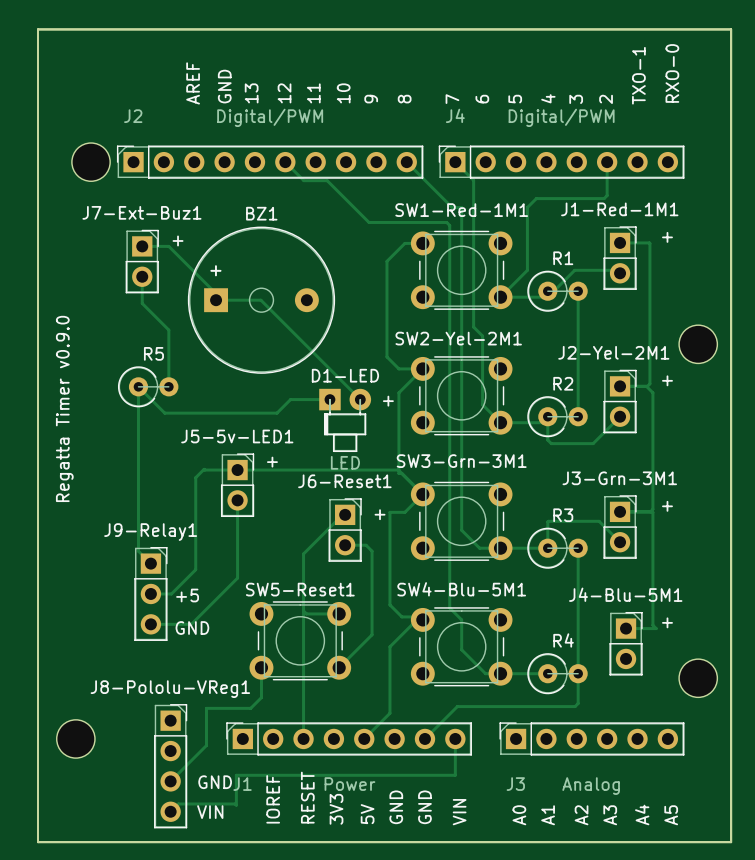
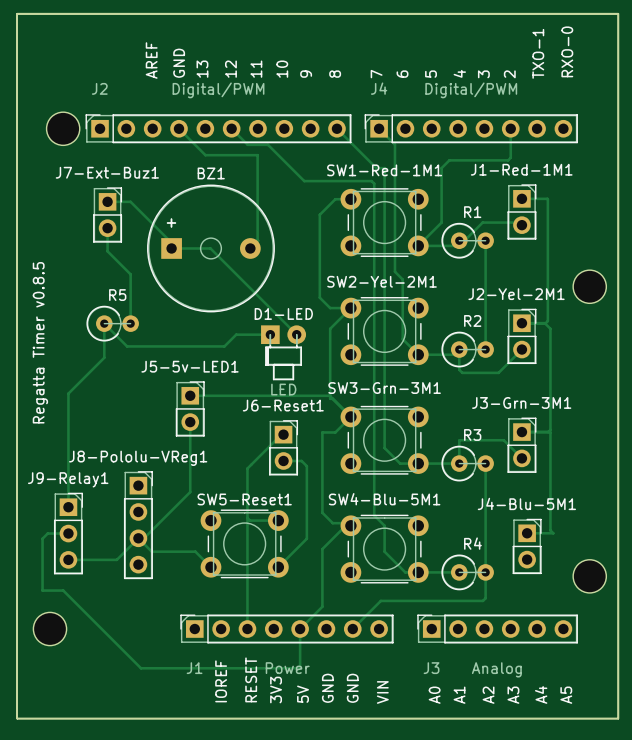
track: none -> (179, 128) (205, 155) (257, 155) (258, 240) (250, 248)
text: + (667, 237) -> none
text: + (178, 240) -> none
text: + (667, 380) -> none
text: + (388, 401) -> none
text: Regatta Timer v0.9.0 (64, 408) -> Regatta Timer v0.8.5 (40, 342)
track: (138, 426) (138, 551) (150, 563) -> (104, 357) (68, 393) (68, 507)
text: + (272, 462) -> none
track: (237, 470) (204, 469) (195, 477) (195, 569) (171, 593) (150, 593) -> none
text: + (667, 506) -> none
text: + (380, 514) -> none
track: (237, 578) (191, 624) (150, 624) -> (190, 489) (190, 492) (144, 538) (138, 538) (151, 551) (195, 551) (210, 567)
J9-Relay1 position: (150, 593) -> (68, 533)
text: +5 (187, 595) -> none
text: + (667, 622) -> none
track: none -> (68, 533) (47, 533) (42, 538) (42, 590) (63, 590) (141, 668) (299, 668) (300, 629)
text: GND (192, 628) -> none
track: none -> (133, 543) (116, 559) (68, 559)
track: (261, 667) (261, 697) (250, 708) (206, 708) (206, 745) (170, 781) -> none
track: (455, 738) (455, 775) (236, 775) (236, 805) (178, 803) (170, 811) -> none
J8-Pololu-VReg1 position: (170, 766) -> (138, 525)
text: GND (215, 782) -> none
text: VIN (210, 812) -> none

